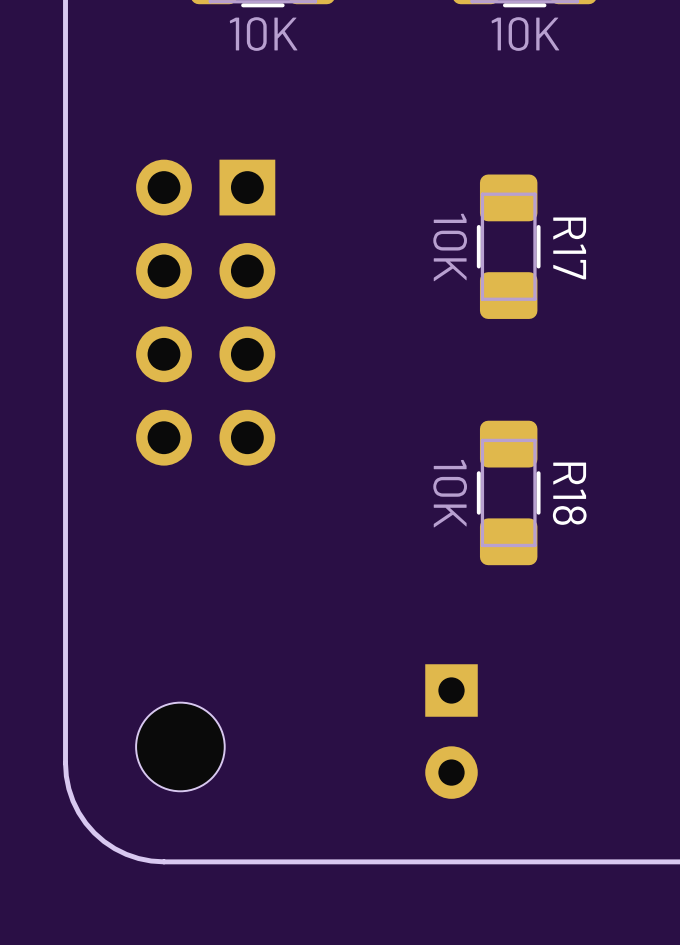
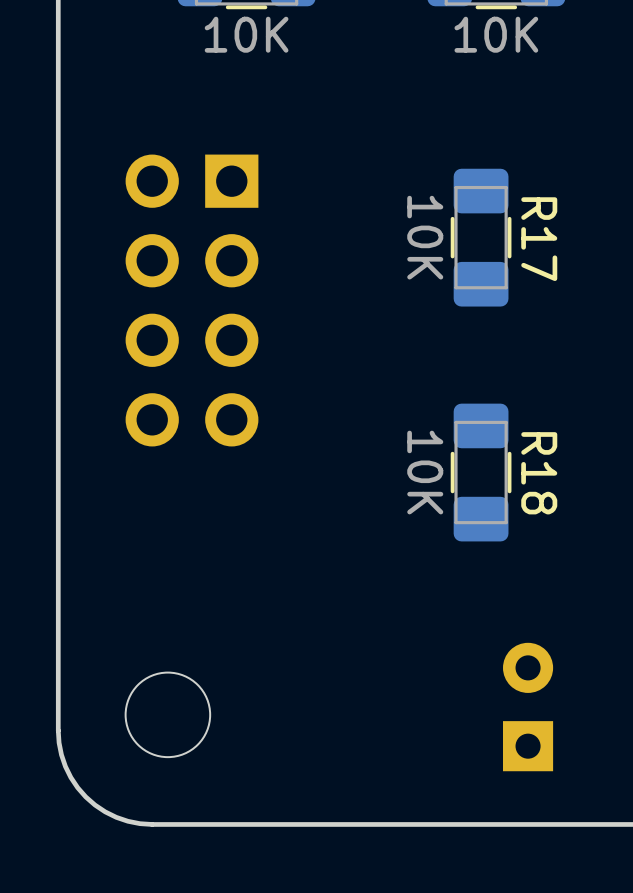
part rotation: 0° (451, 731) -> 180° (528, 707)
part position: (451, 731) -> (528, 707)

